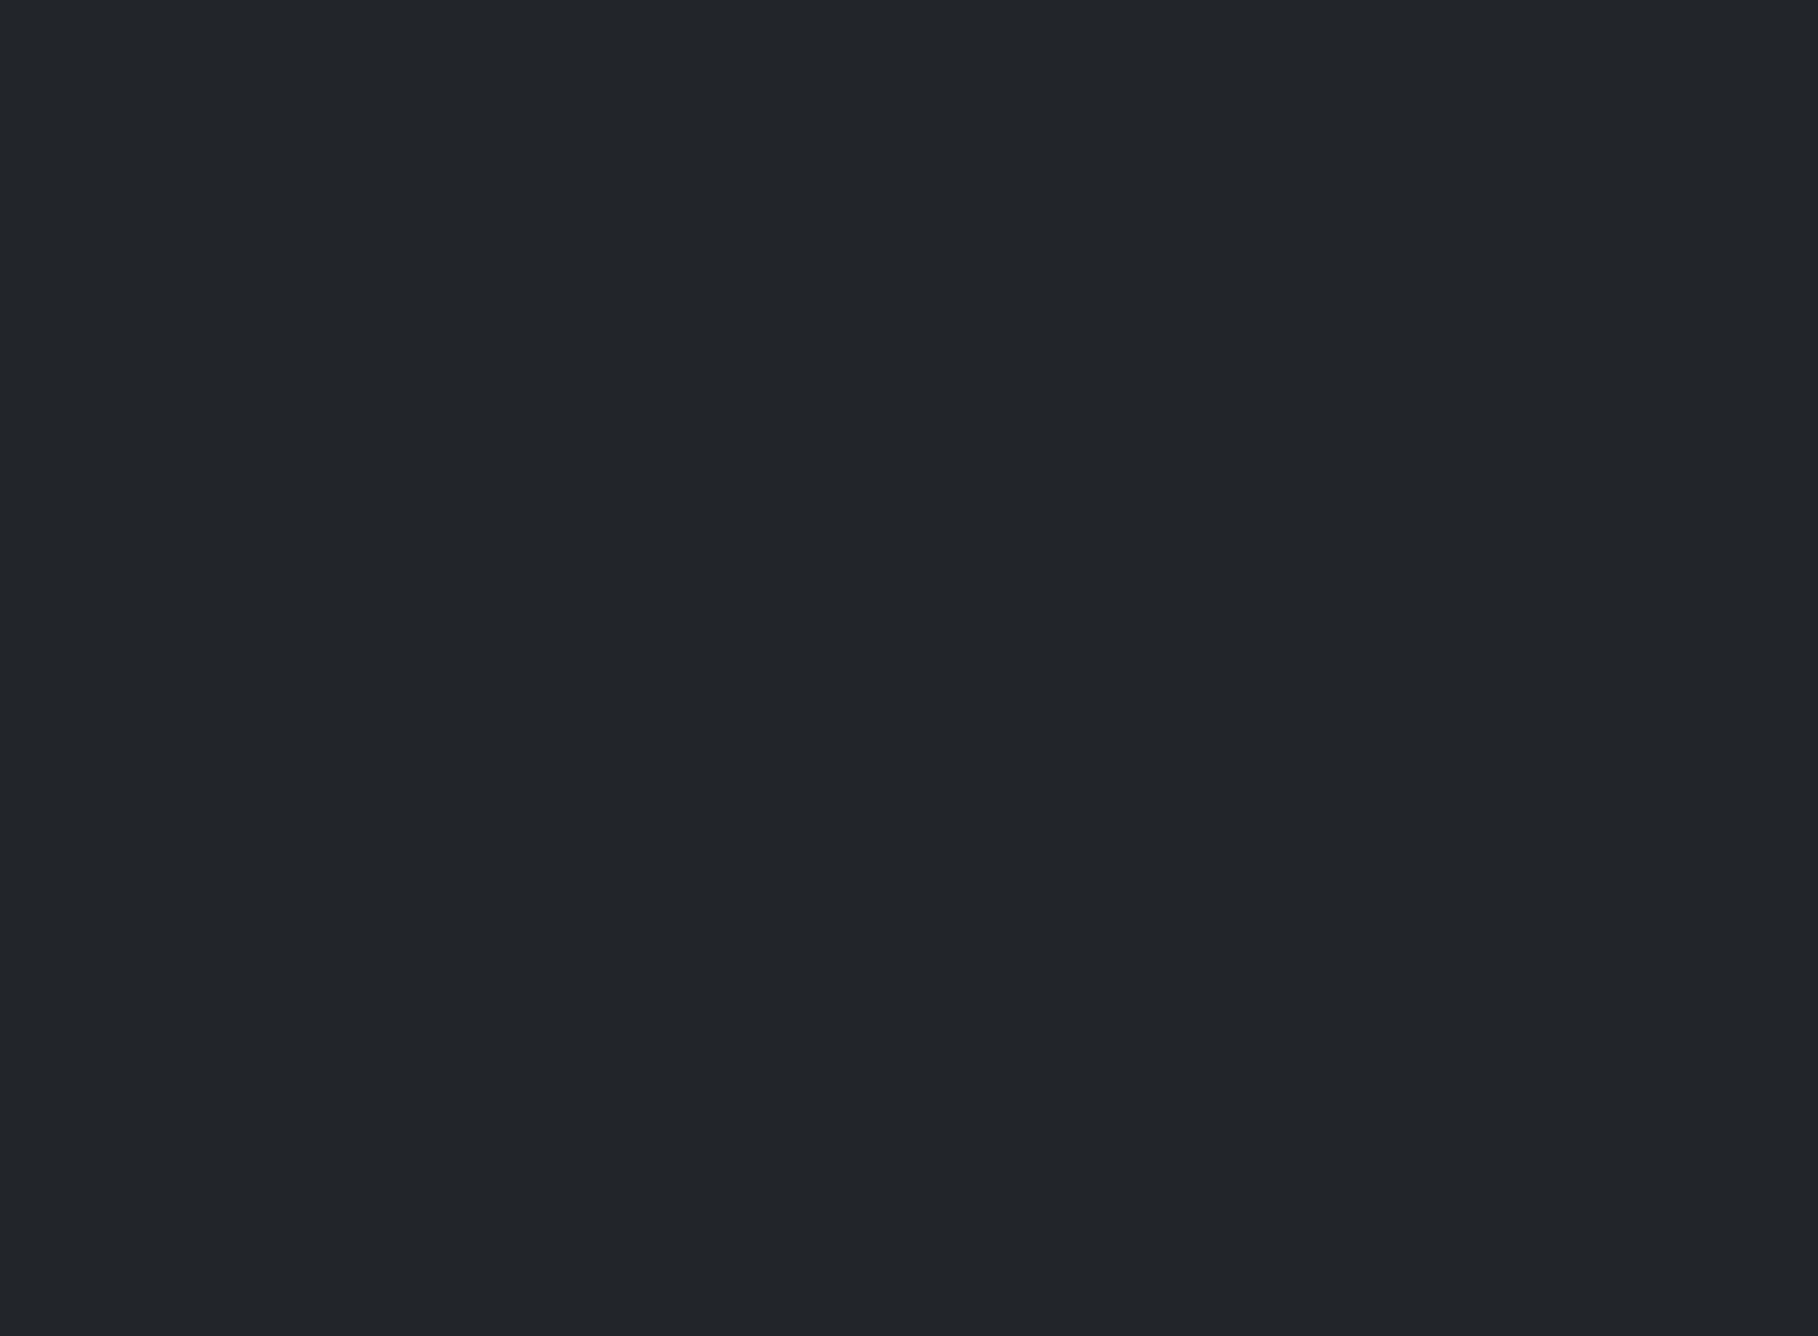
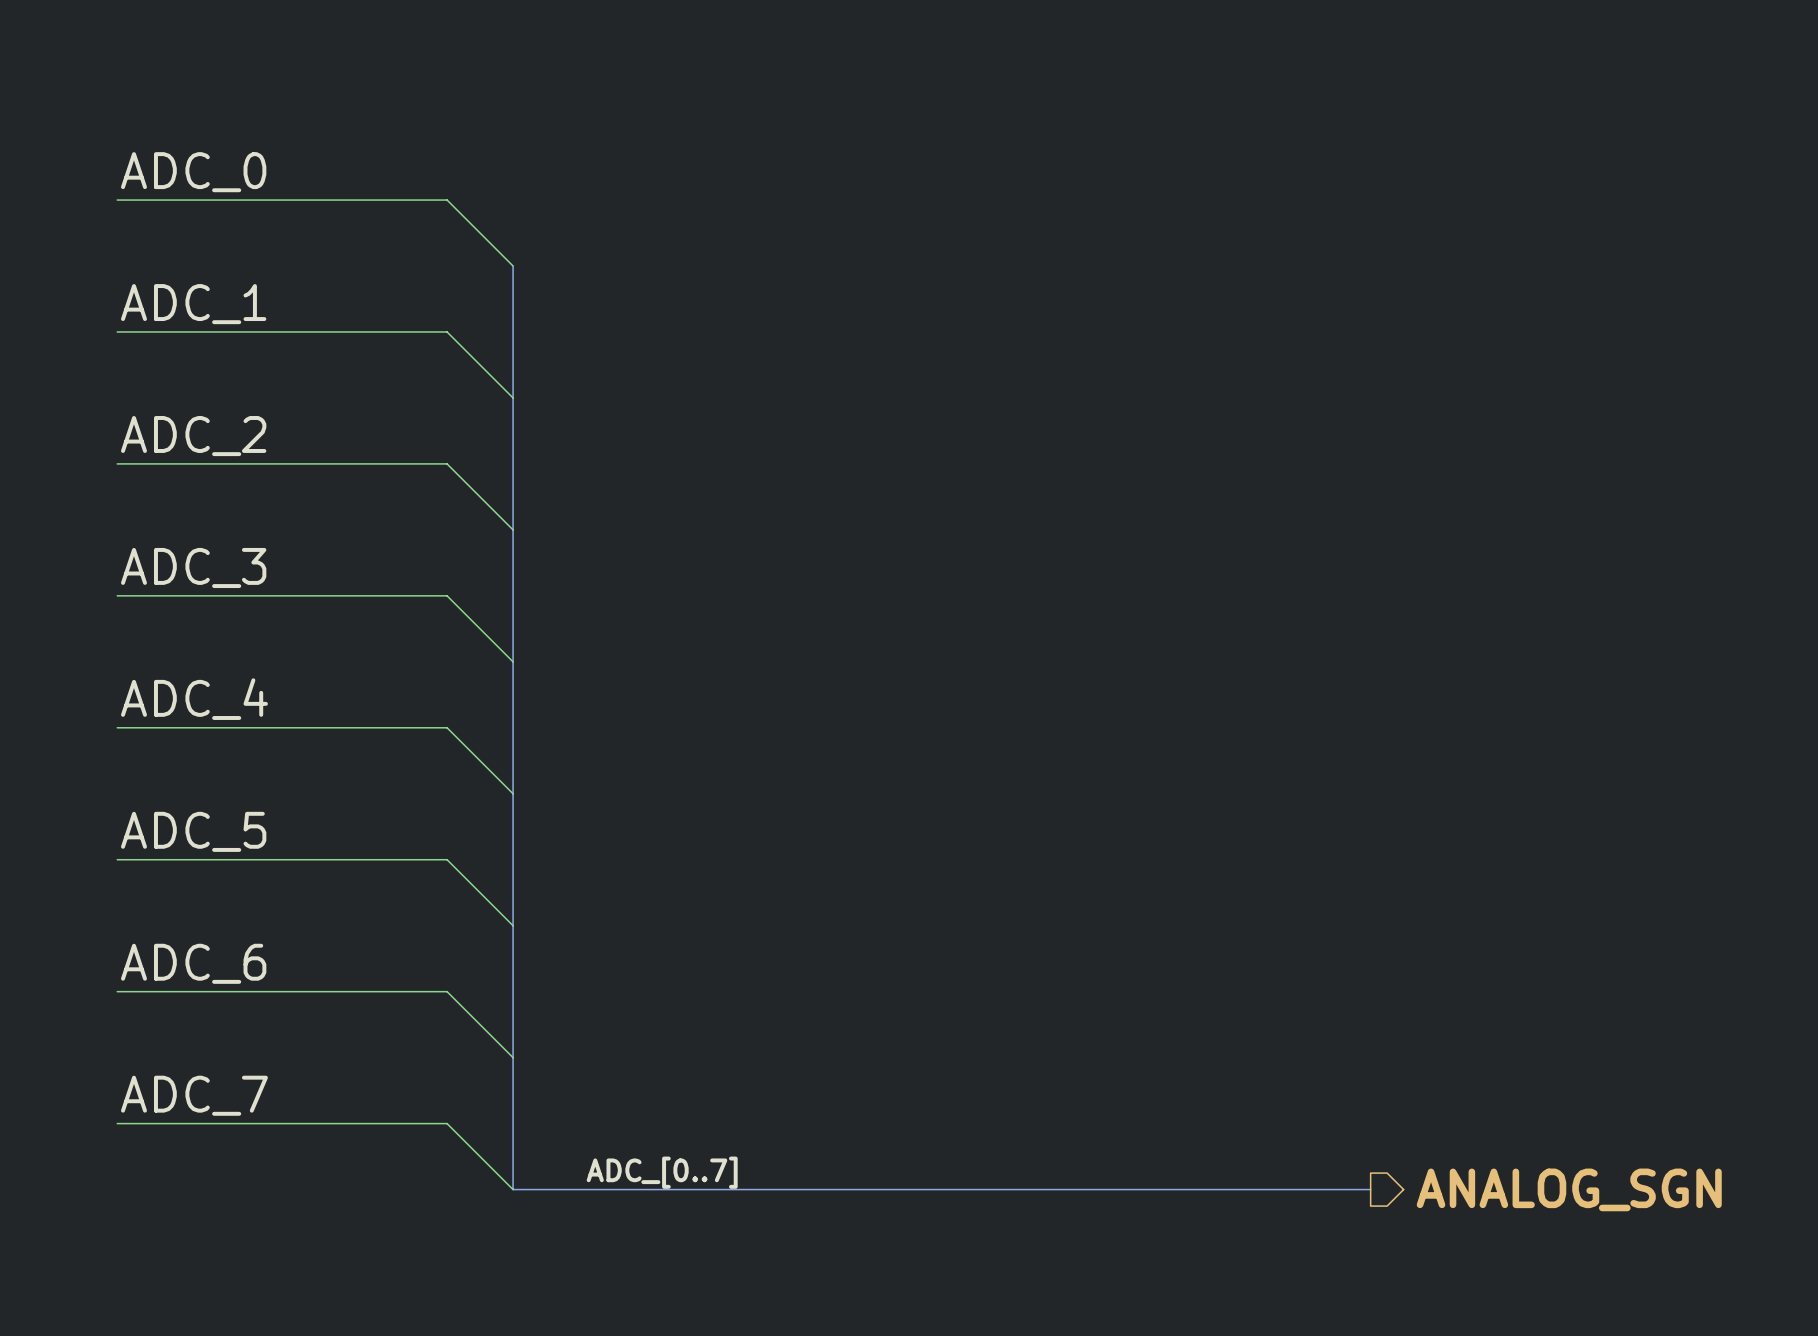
label: none -> ADC_0 (193, 172)
wire: none -> (117, 200) (447, 200) (513, 266)
bus: none -> (513, 266) (513, 1189) (1370, 1189)
label: none -> ADC_1 (193, 304)
wire: none -> (117, 331) (447, 331) (513, 397)
label: none -> ADC_2 (193, 436)
wire: none -> (117, 463) (447, 463) (513, 529)
label: none -> ADC_3 (193, 567)
wire: none -> (117, 595) (447, 595) (513, 661)
label: none -> ADC_4 (194, 699)
wire: none -> (117, 727) (447, 727) (513, 793)
label: none -> ADC_5 (193, 831)
wire: none -> (117, 859) (447, 859) (513, 925)
label: none -> ADC_6 (193, 963)
wire: none -> (117, 991) (447, 991) (513, 1057)
label: none -> ADC_7 (194, 1095)
wire: none -> (117, 1123) (447, 1123) (513, 1189)
label: none -> ADC_[0..7] (662, 1172)
hierarchical label: none -> ANALOG_SGN (1569, 1189)

